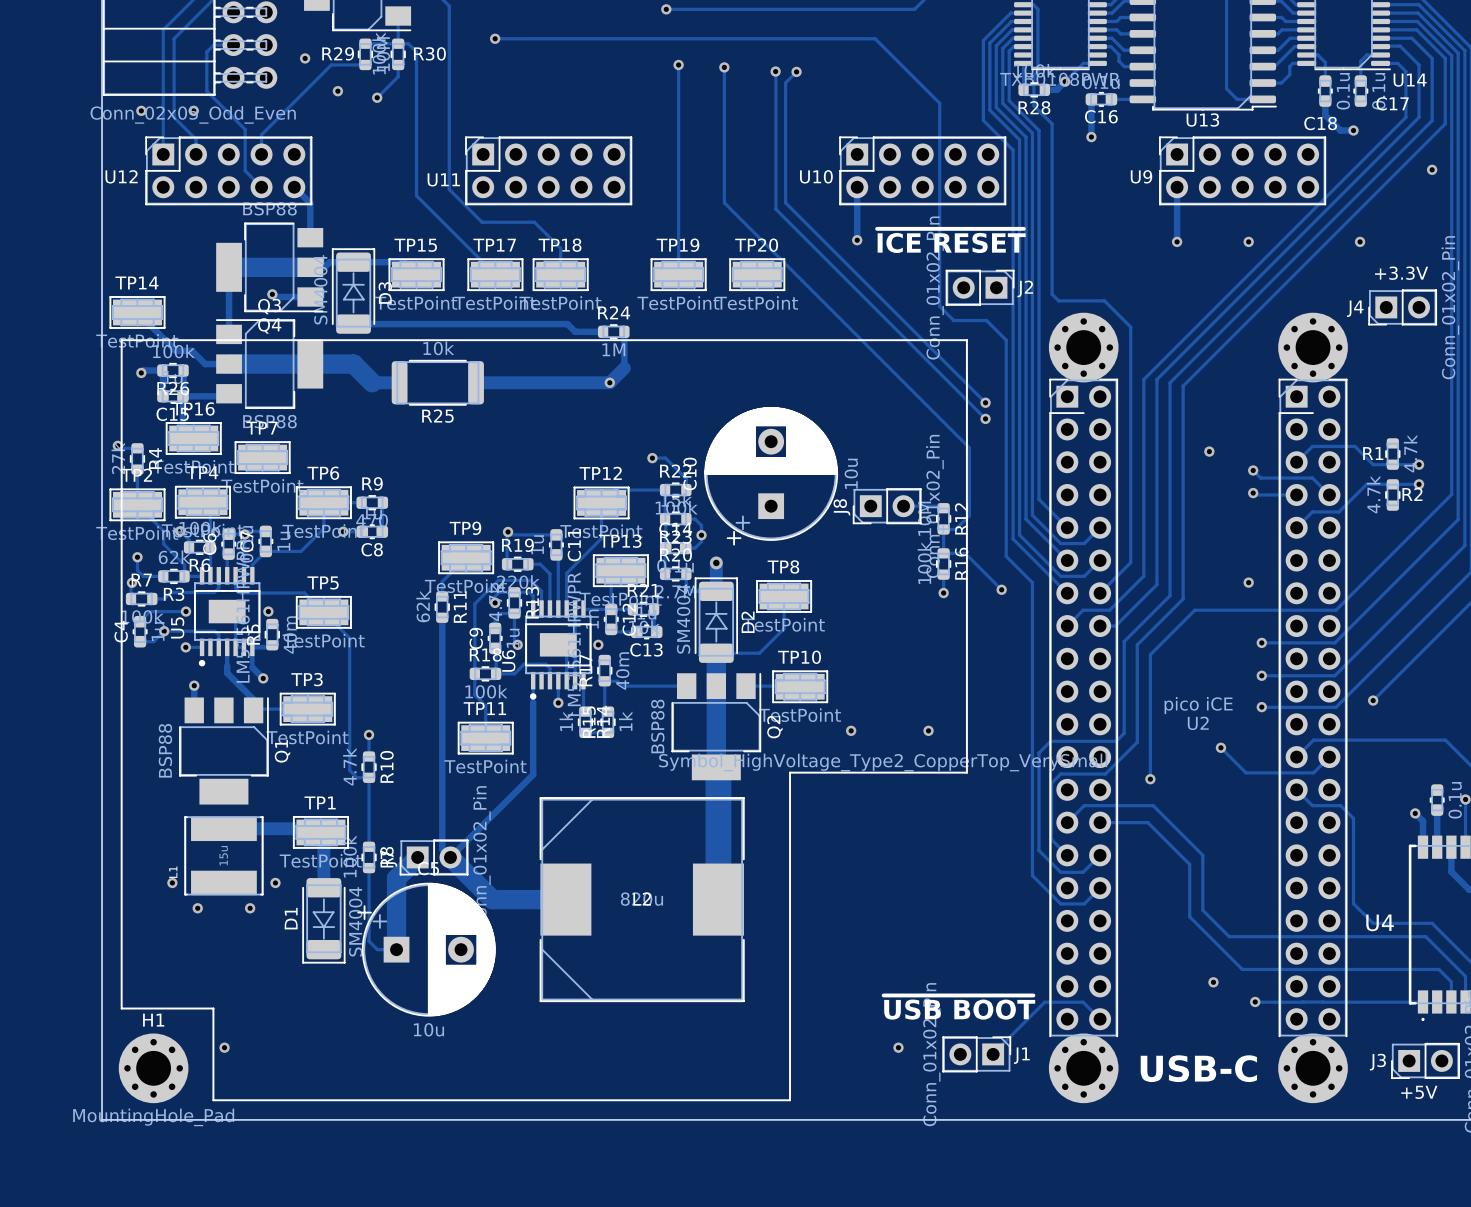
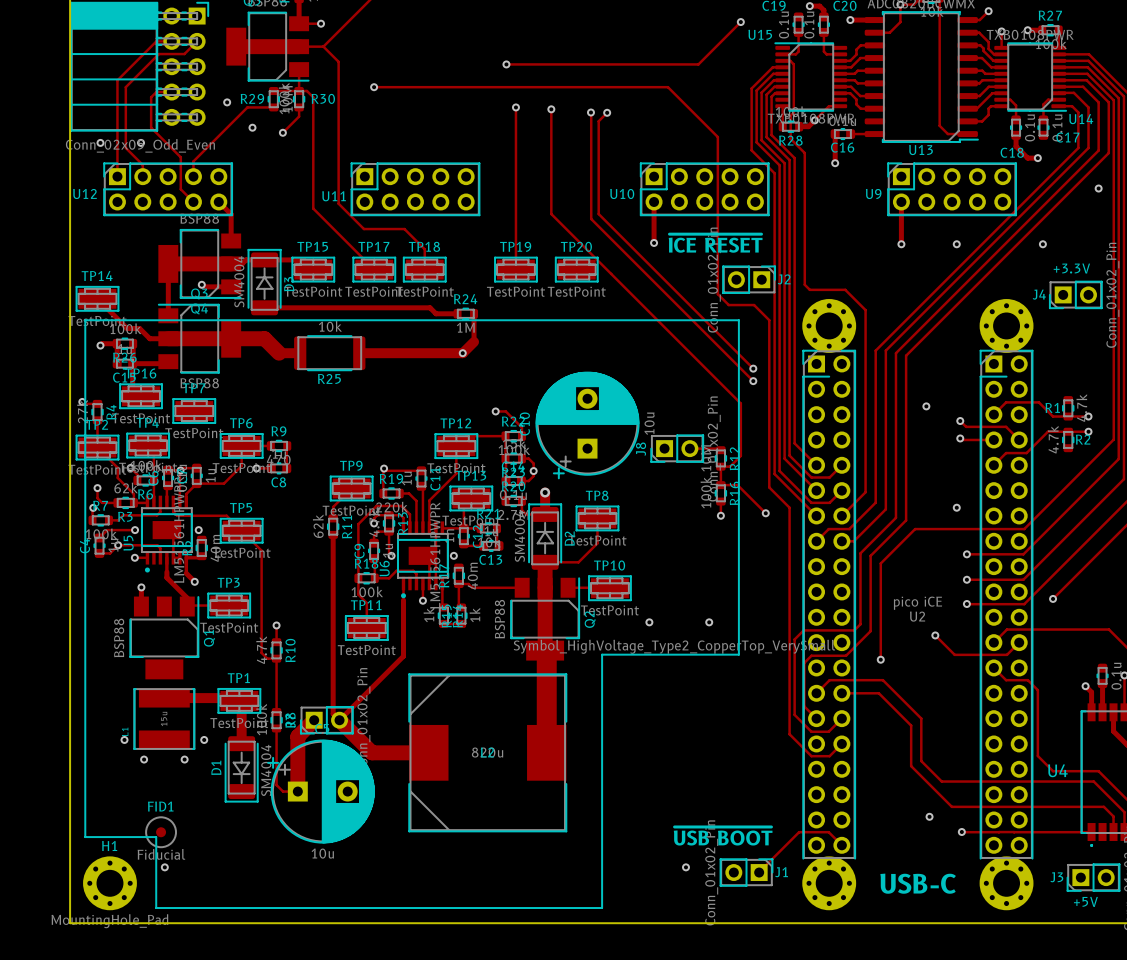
FID1: none -> Fiducial (161, 832)

